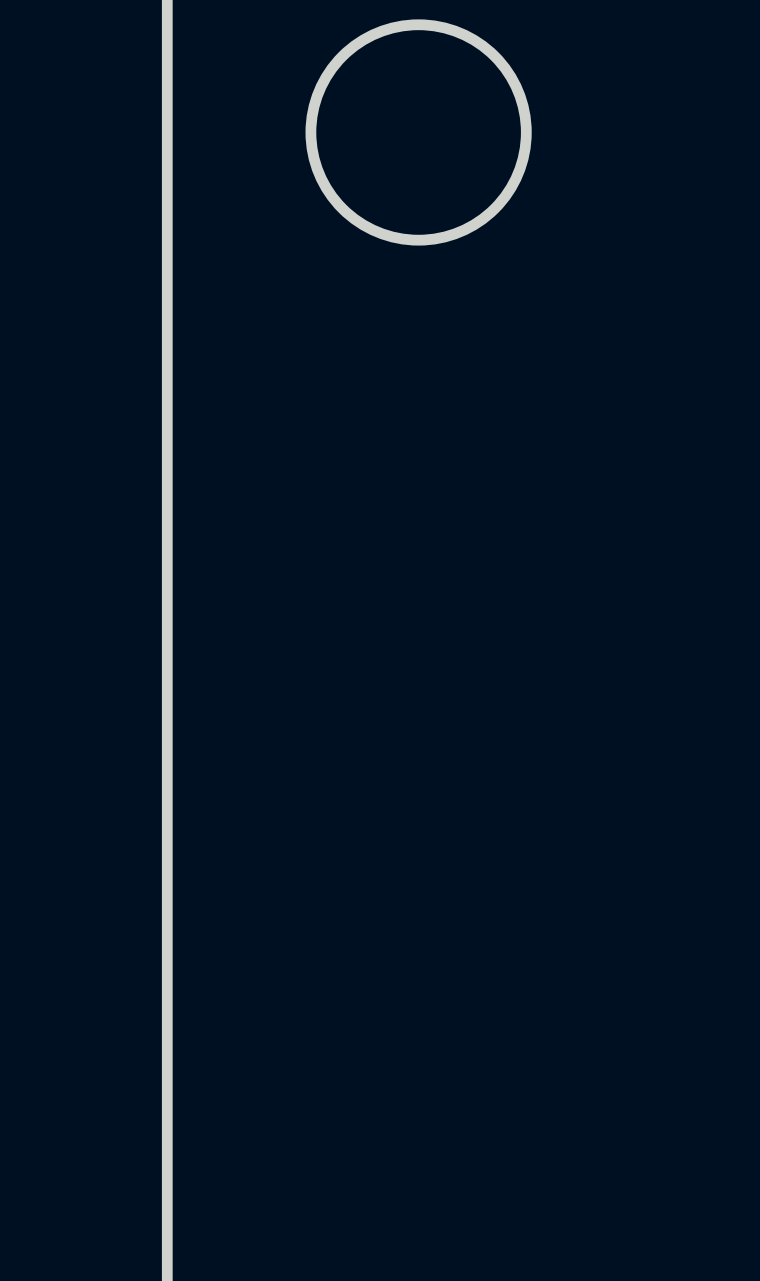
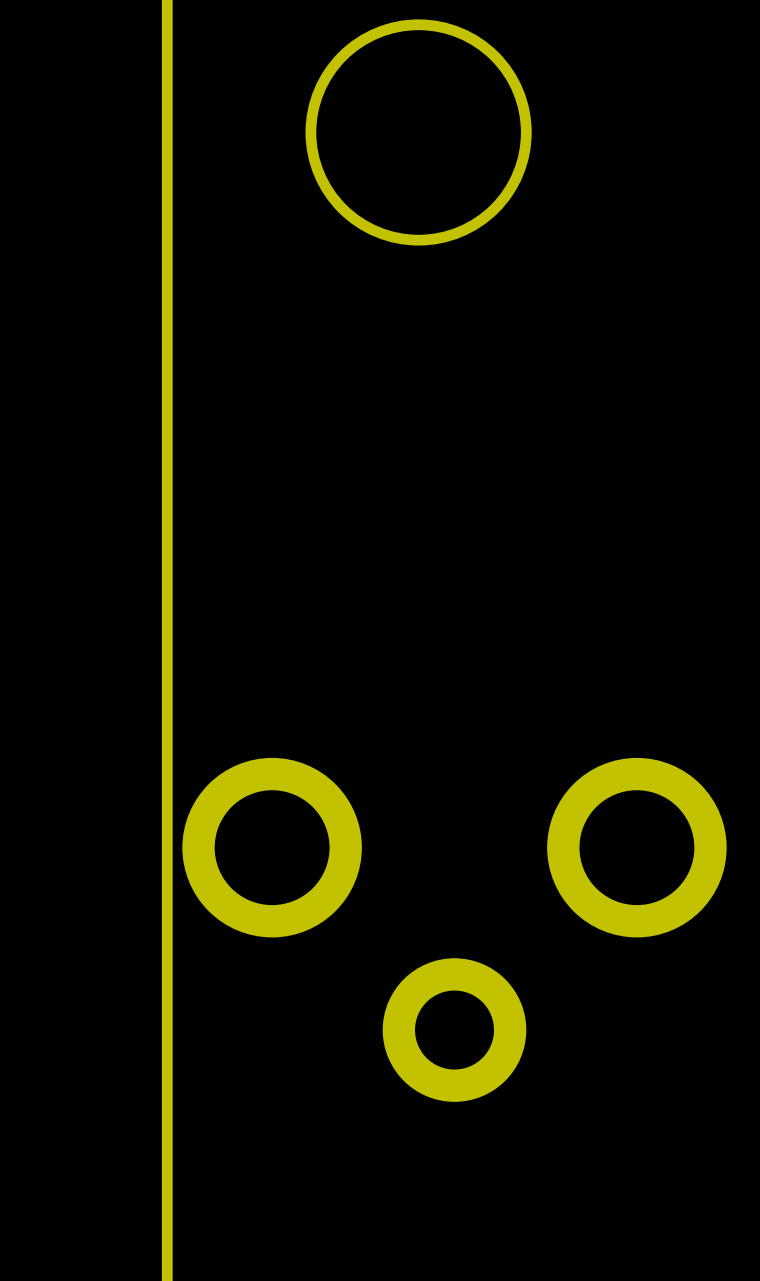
part: none -> (454, 929)

